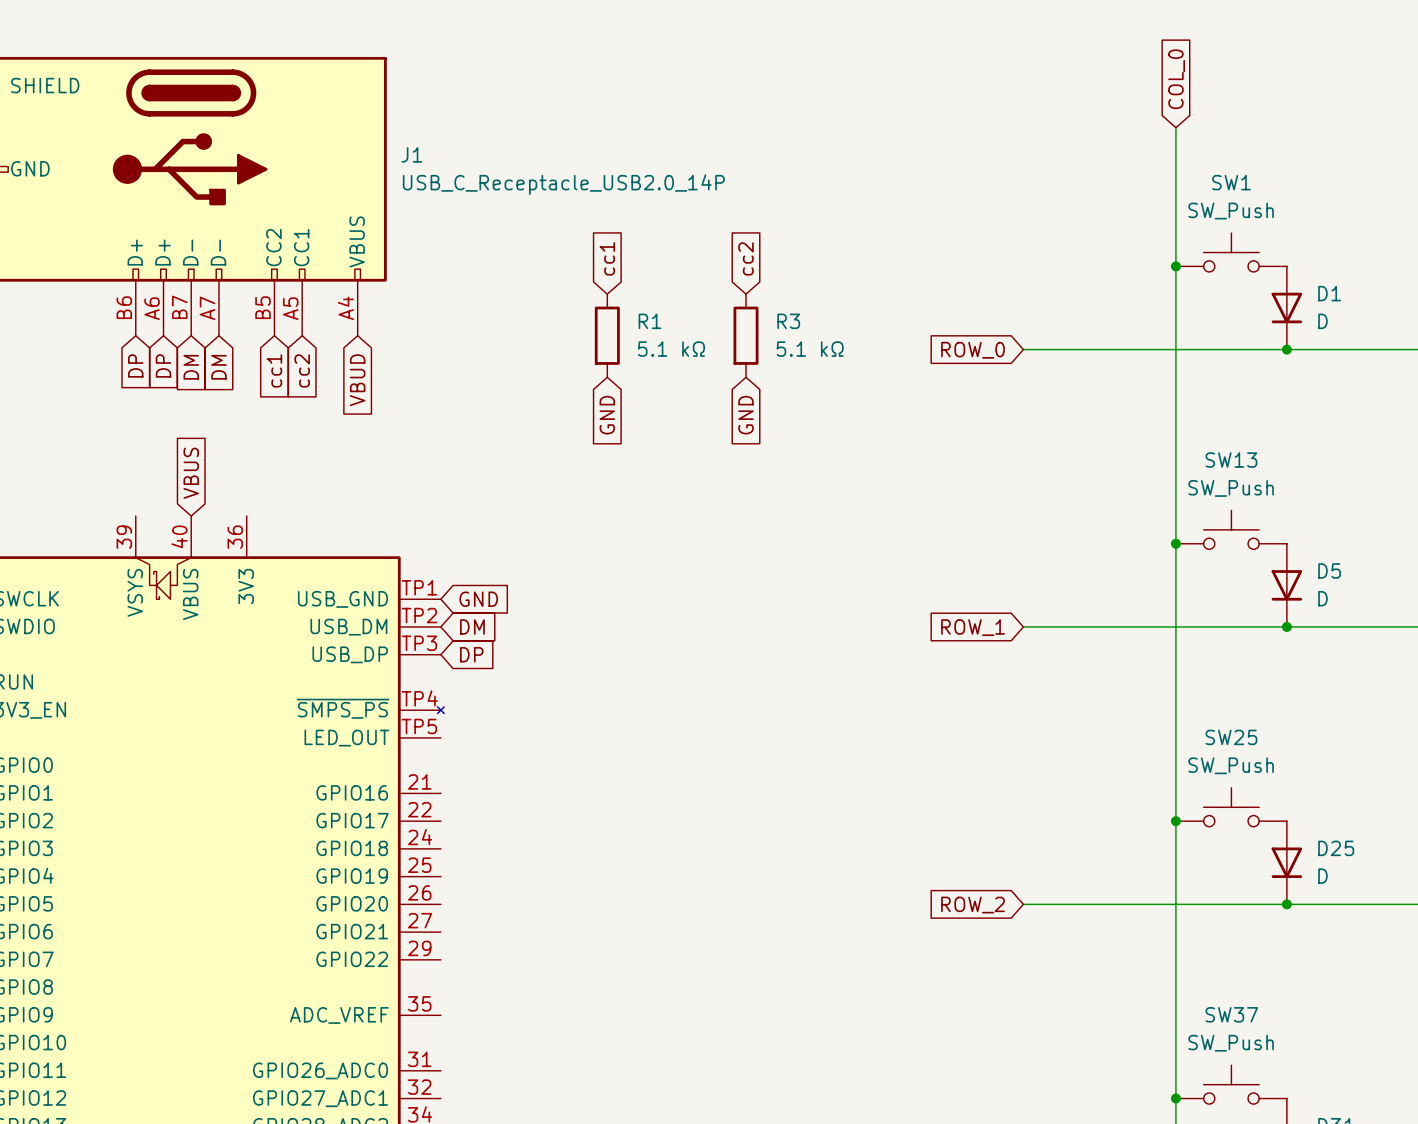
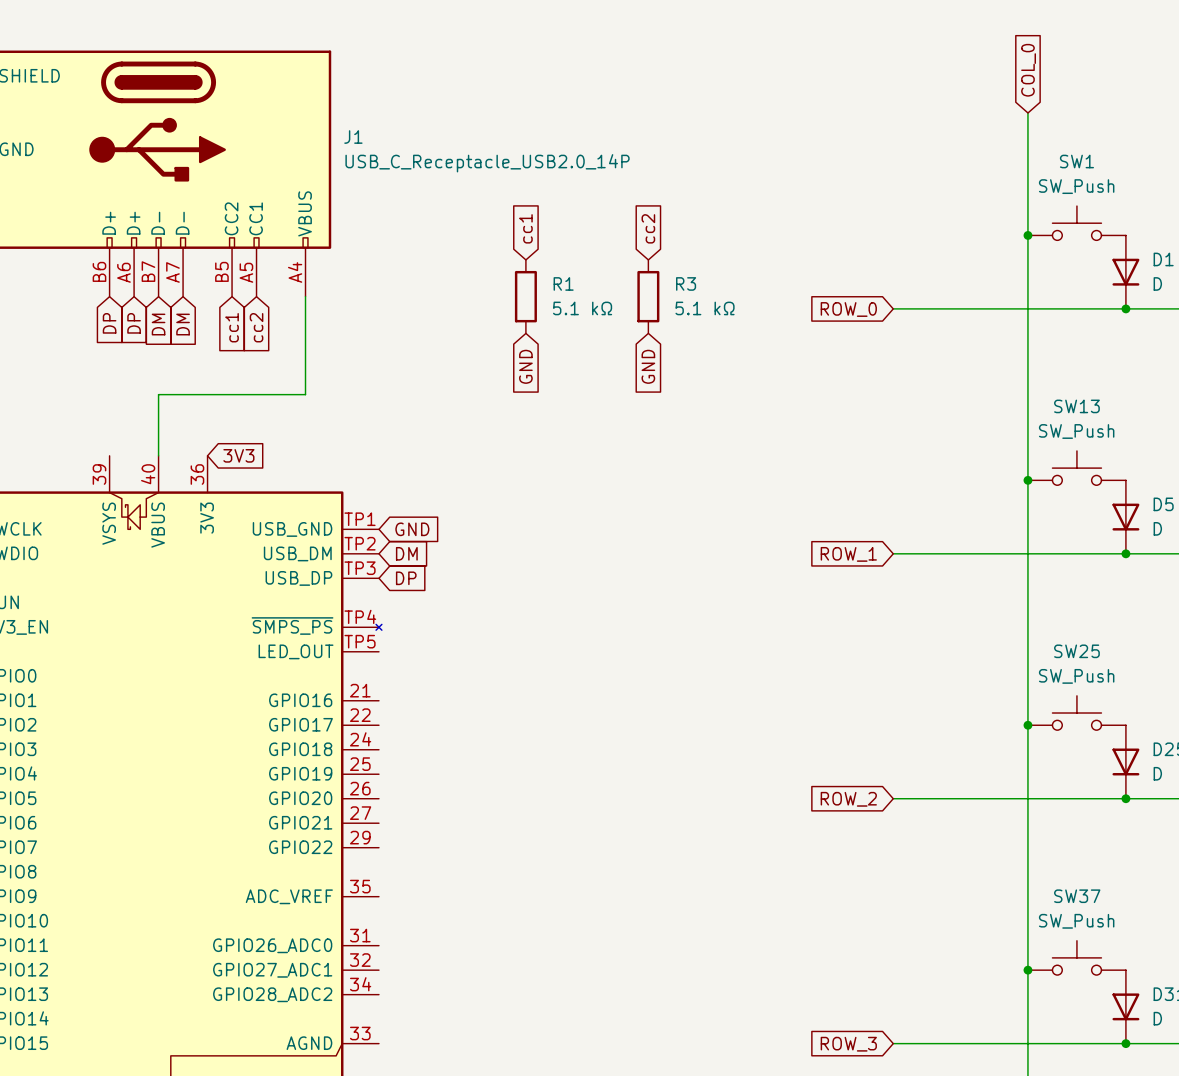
wire: none -> (305, 296) (305, 394) (158, 394) (158, 455)
global label: VBUD (357, 380) -> none
global label: VBUS (191, 473) -> none
global label: none -> 3V3 (238, 455)

